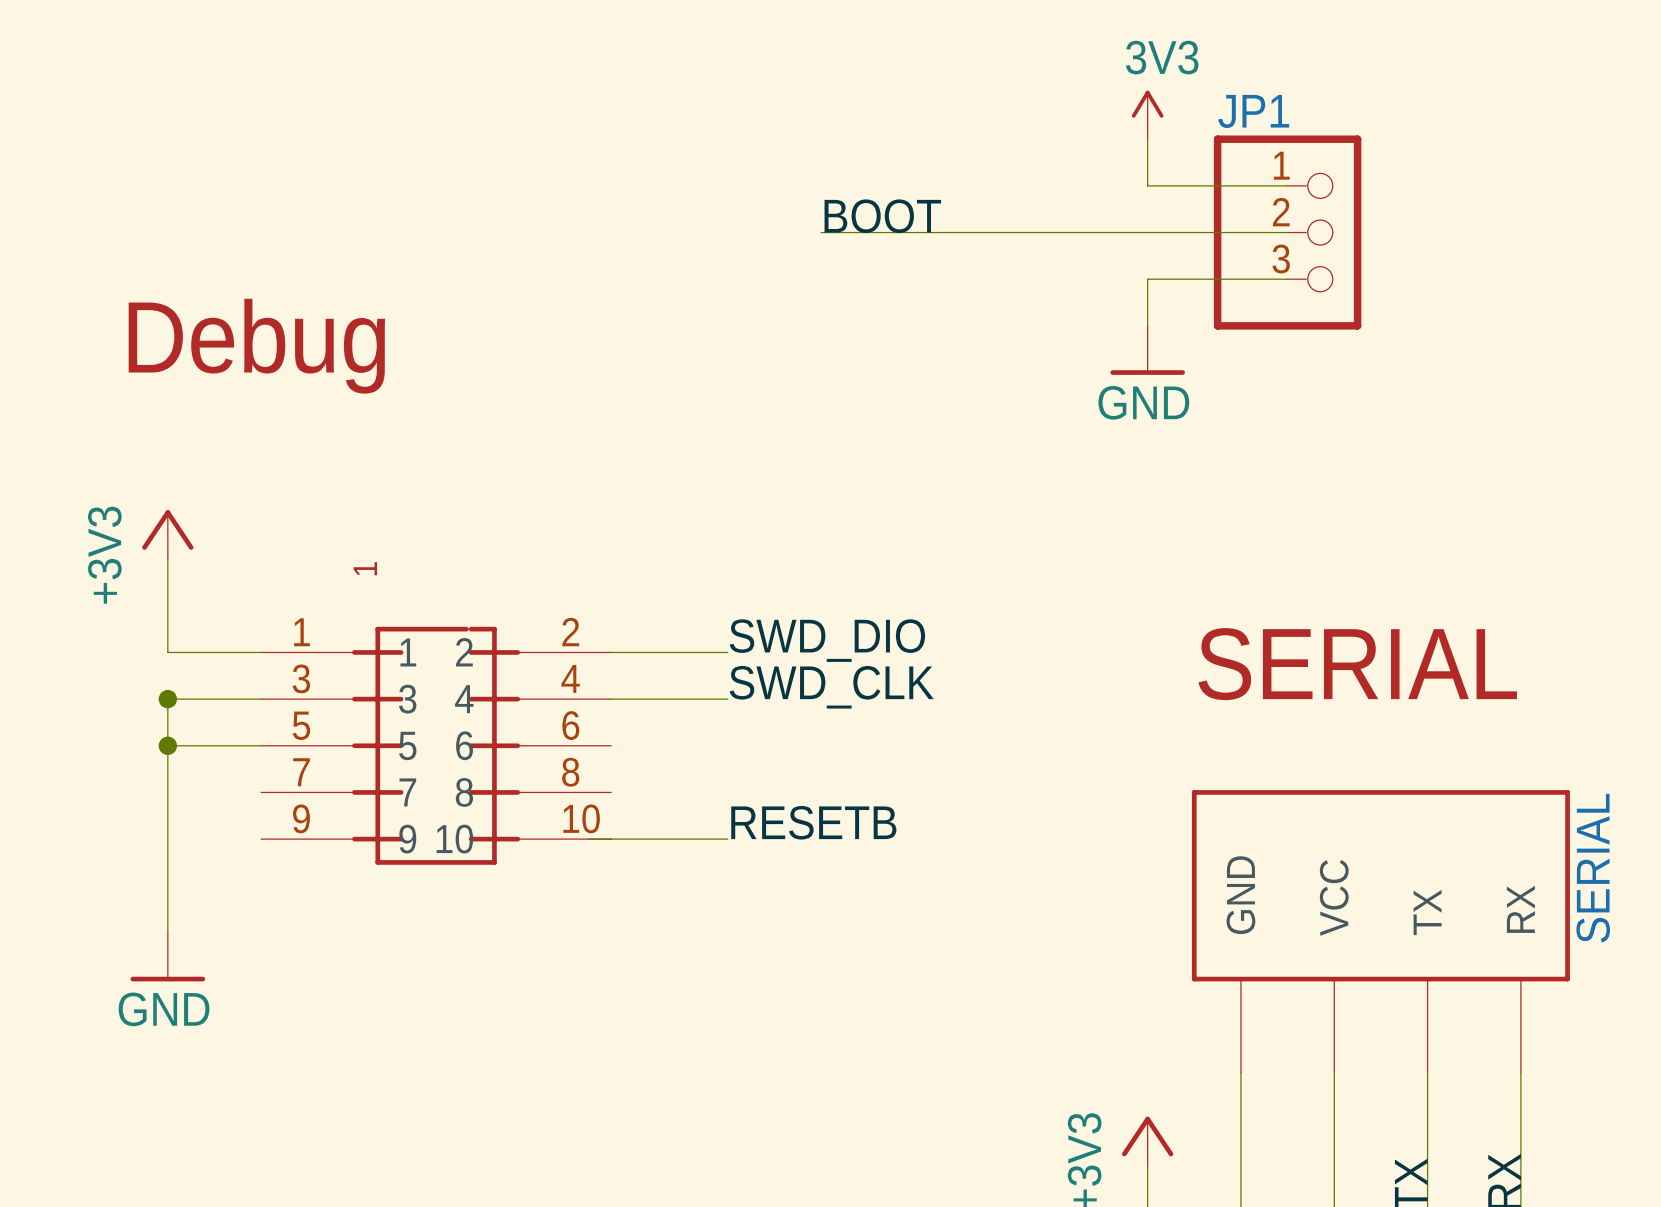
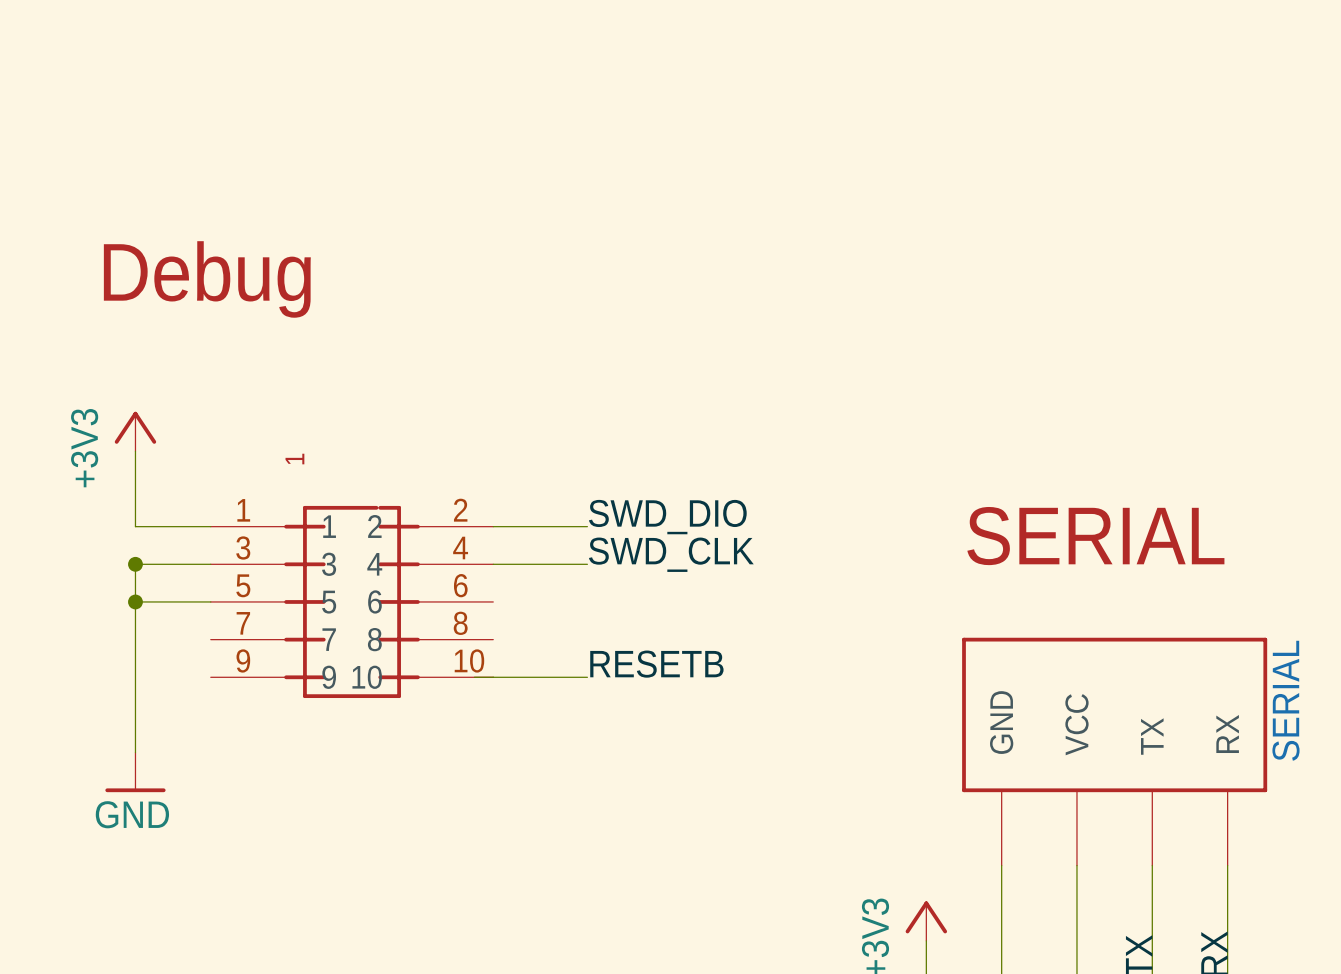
power symbol: 3V3 (1147, 114) -> none
wire: (1147, 139) (1147, 185) (1287, 185) -> none
label: BOOT (882, 216) -> none
wire: (821, 232) (1287, 232) -> none
JP1: (1287, 232) -> none
wire: (1287, 279) (1147, 279) (1147, 325) -> none
power symbol: GND (1147, 350) -> none

